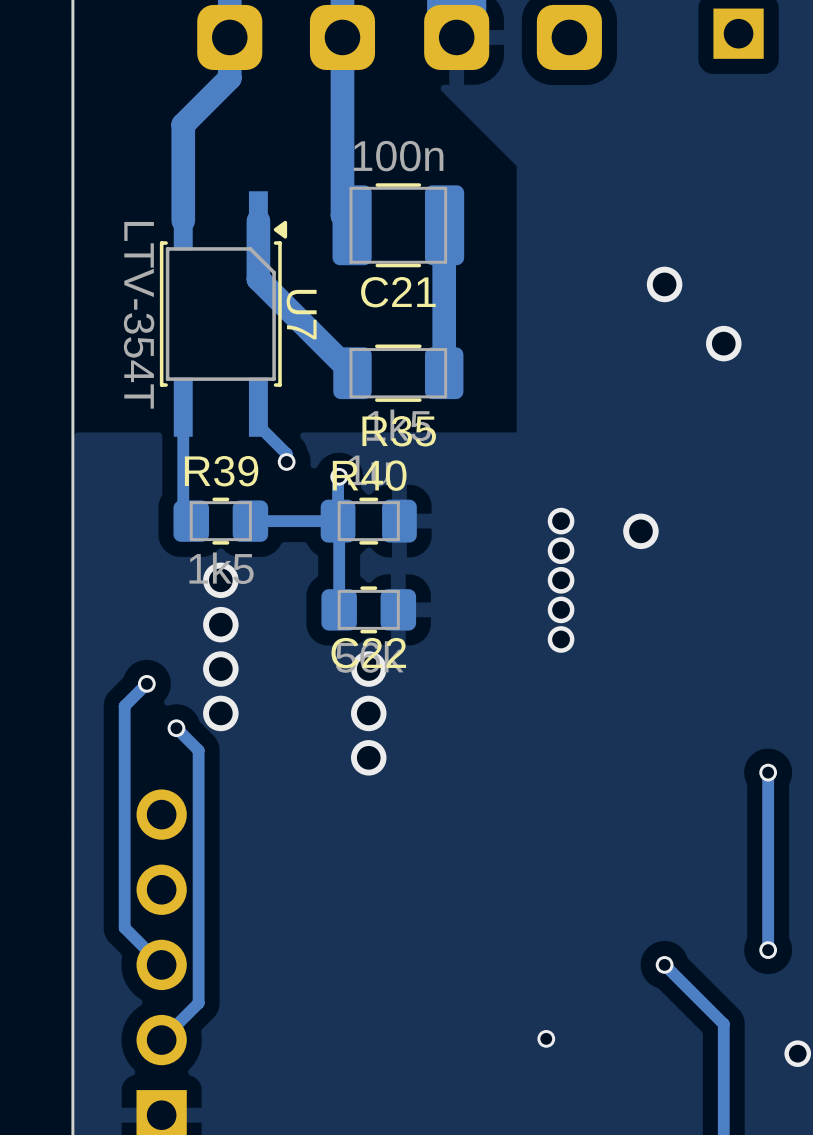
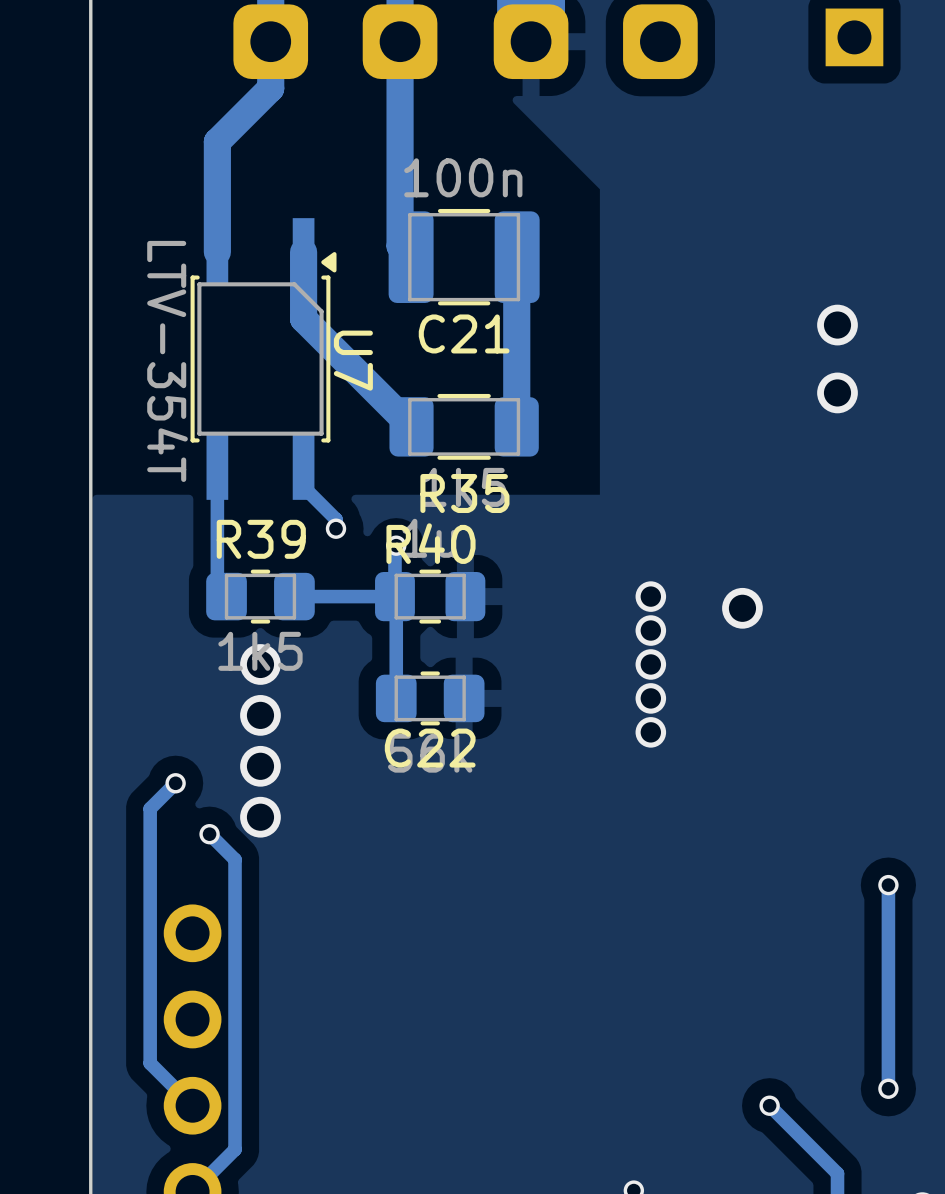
via position: (664, 284) -> (837, 325)
via: (368, 669) -> none
via: (368, 713) -> none
via: (368, 757) -> none

